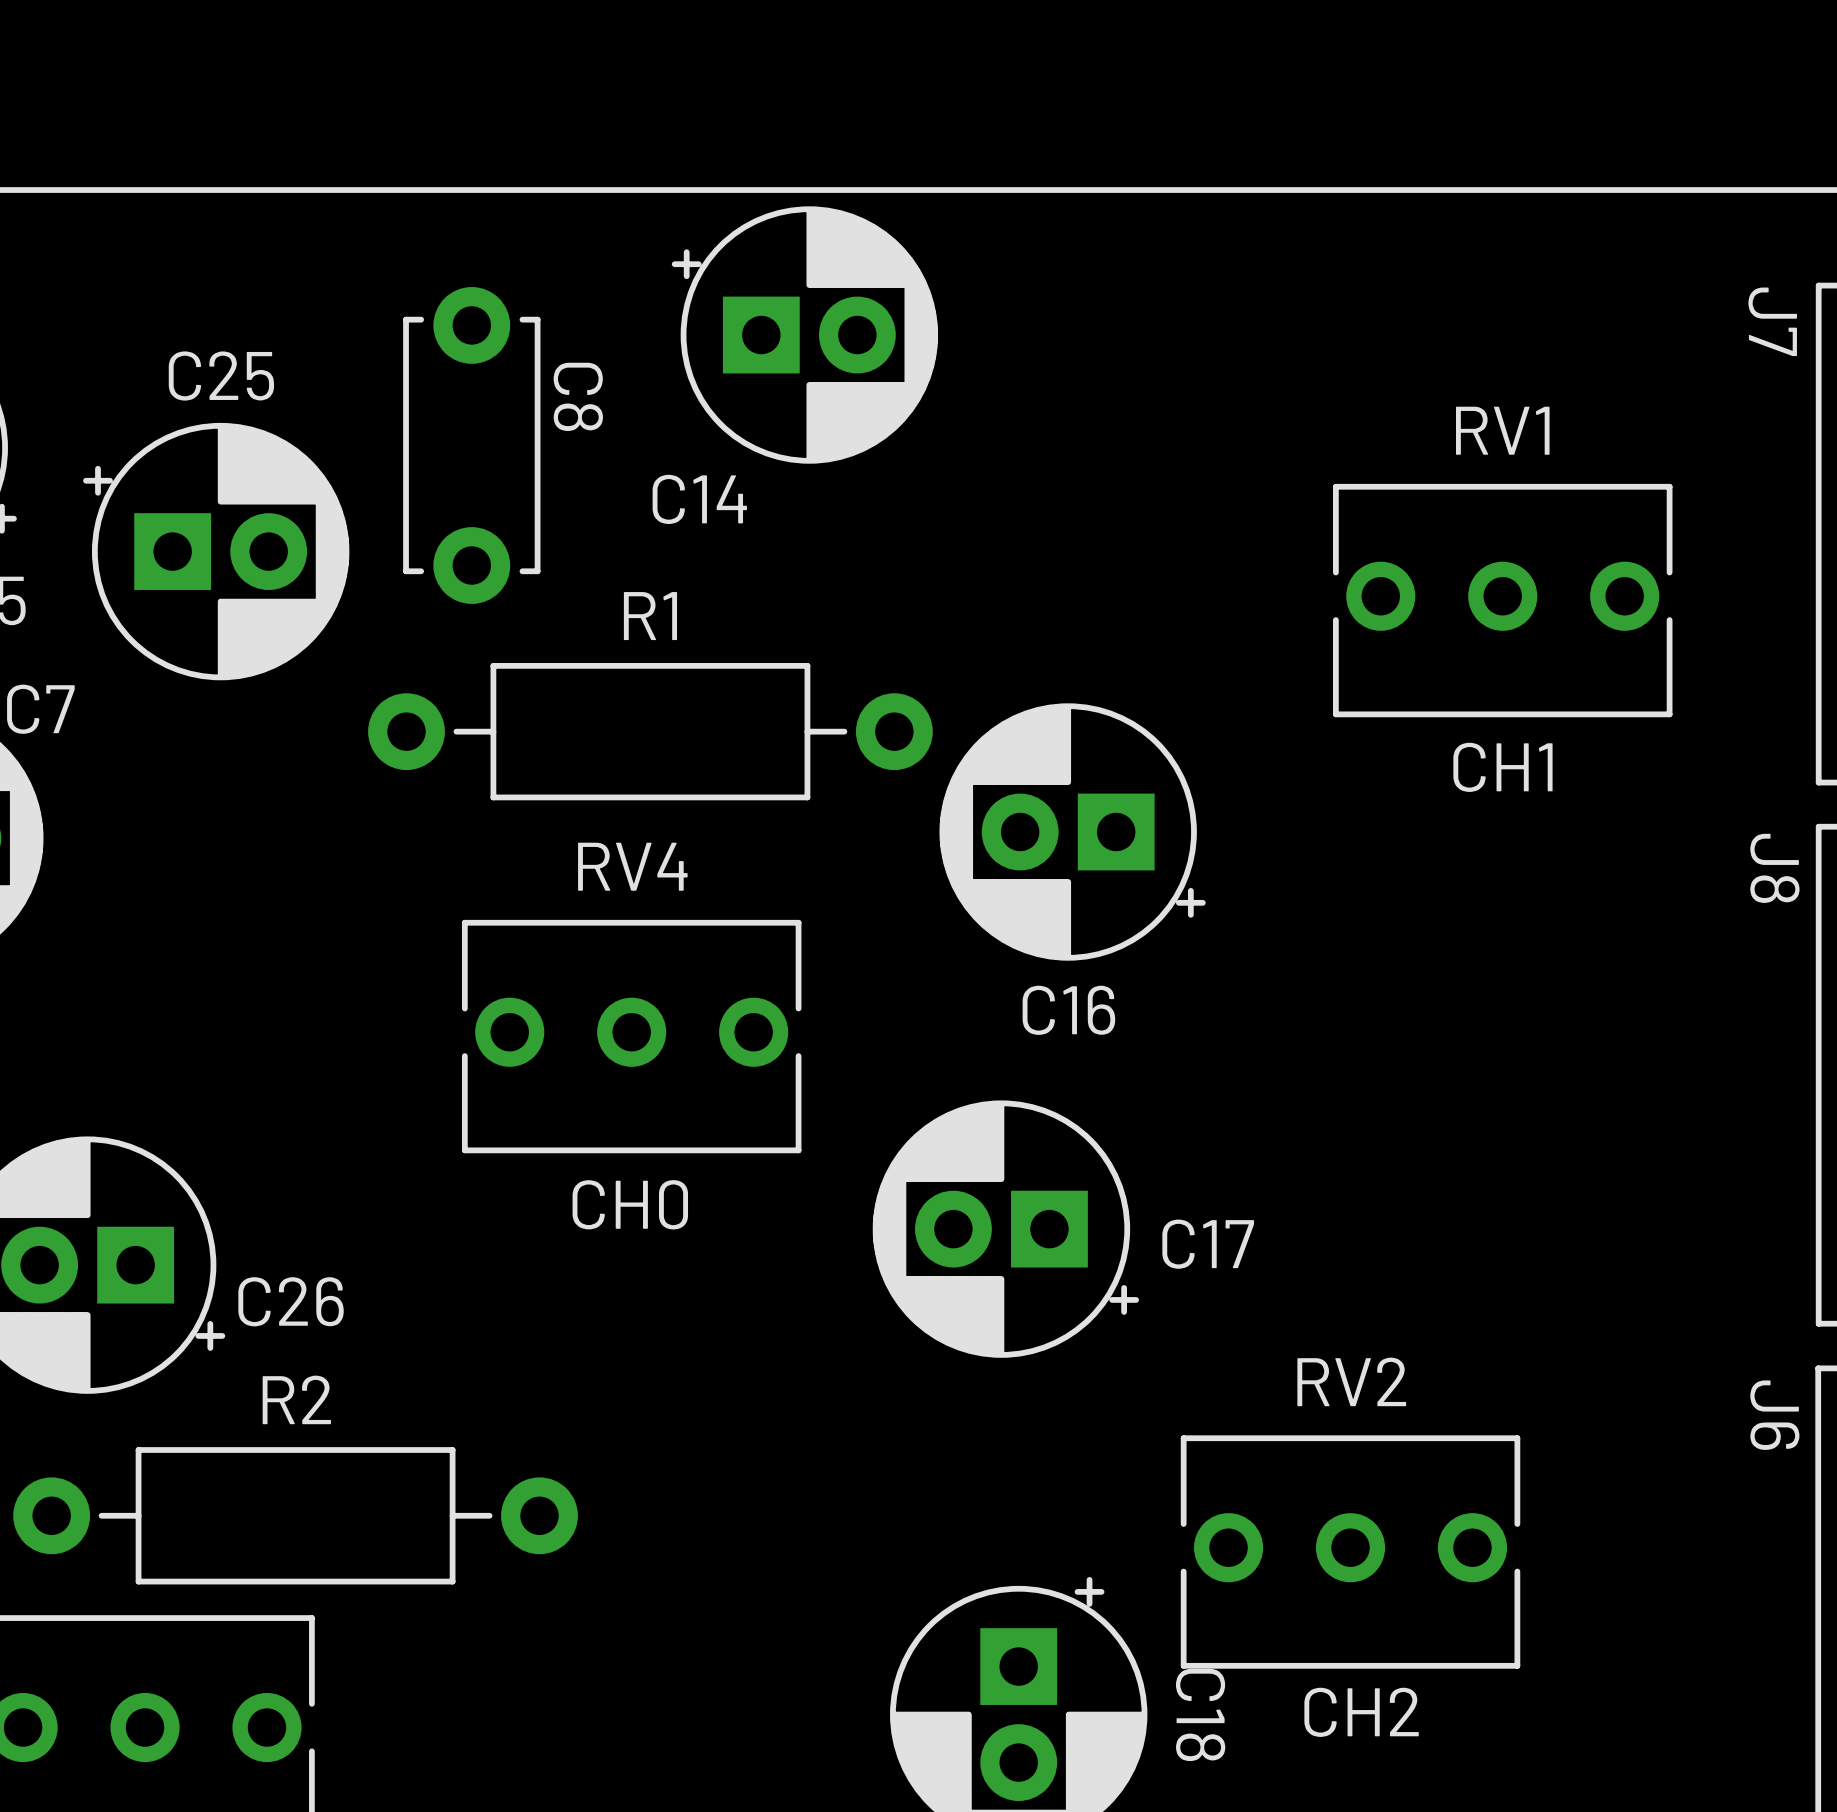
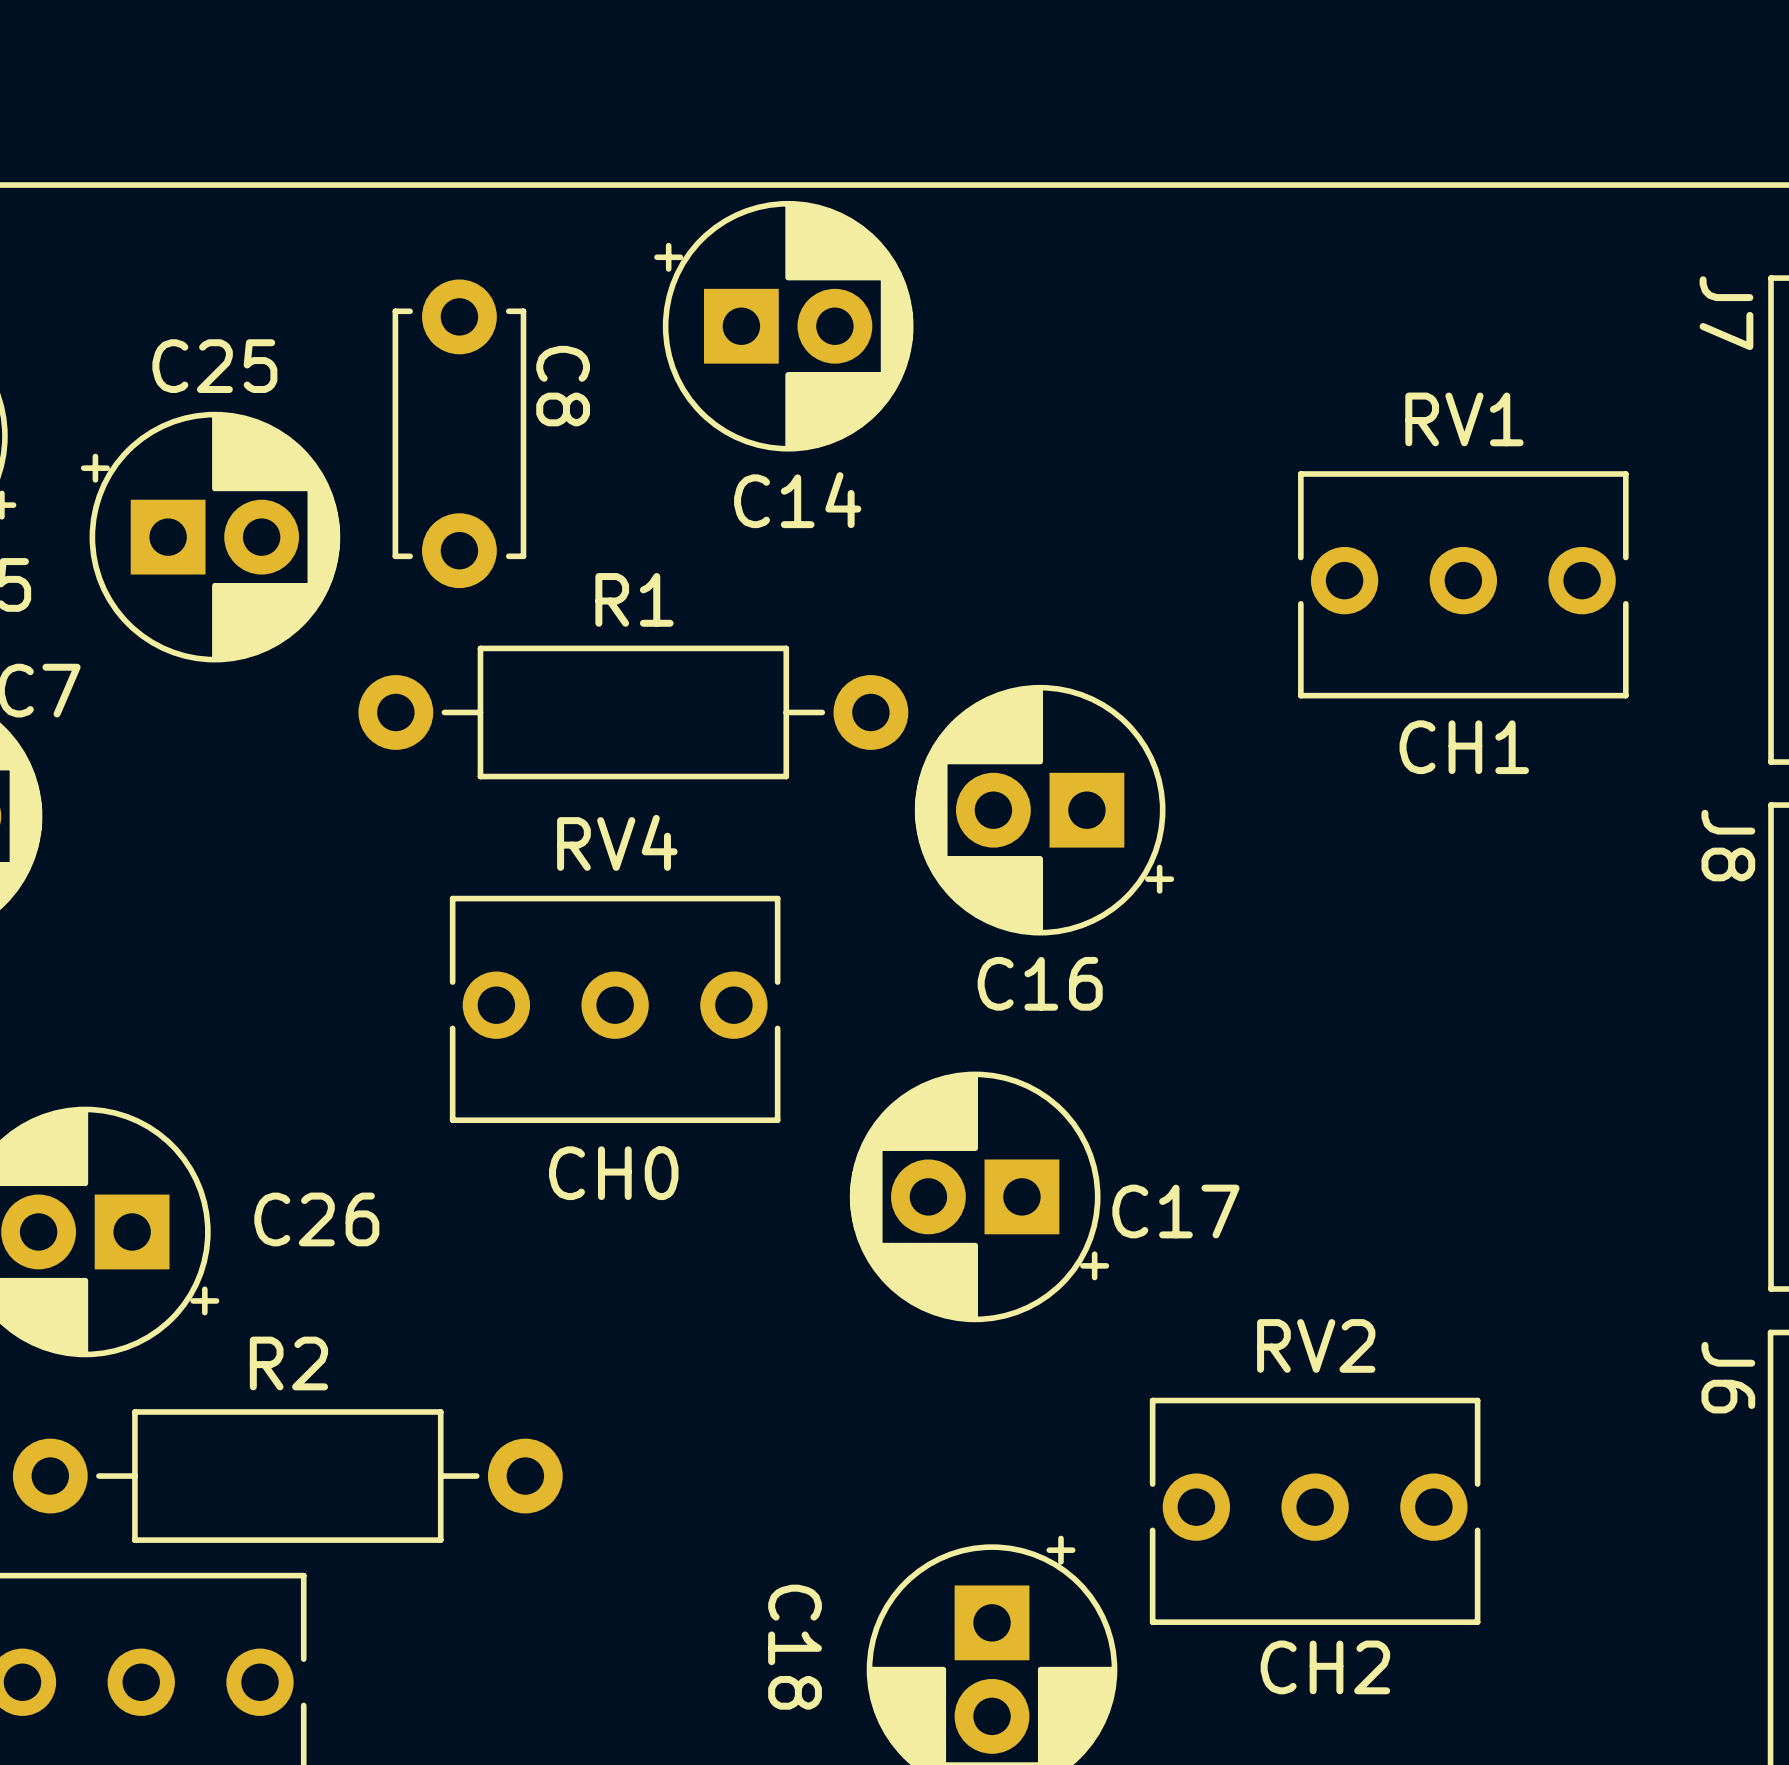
C14 name position: C14 (699, 499) -> C14 (797, 500)
C26 name position: C26 (291, 1301) -> C26 (316, 1219)
C18 name position: C18 (1200, 1714) -> C18 (795, 1647)

